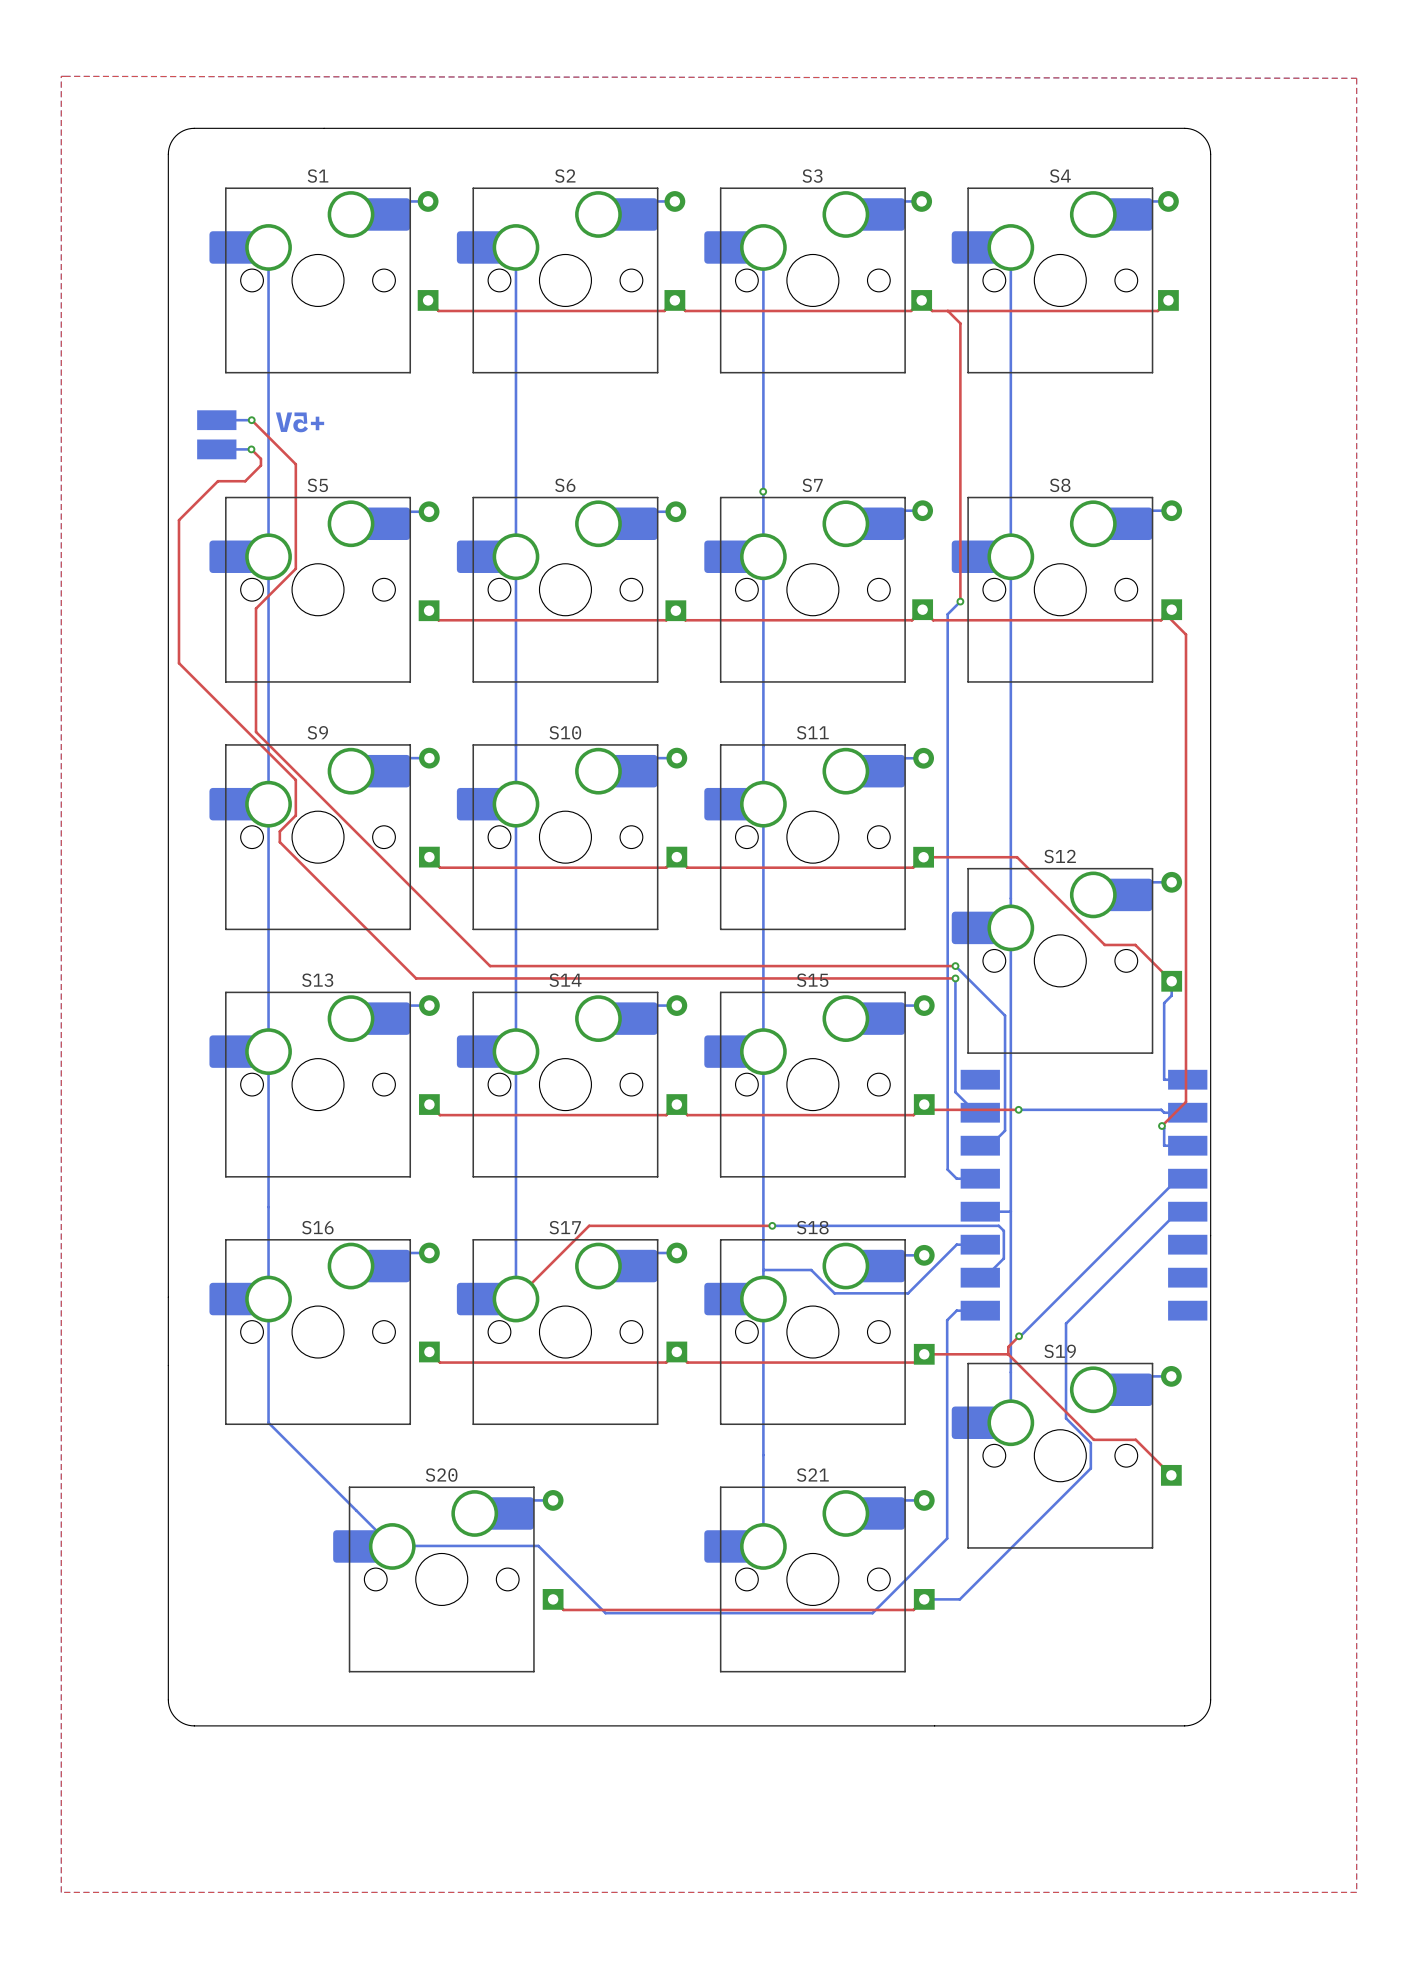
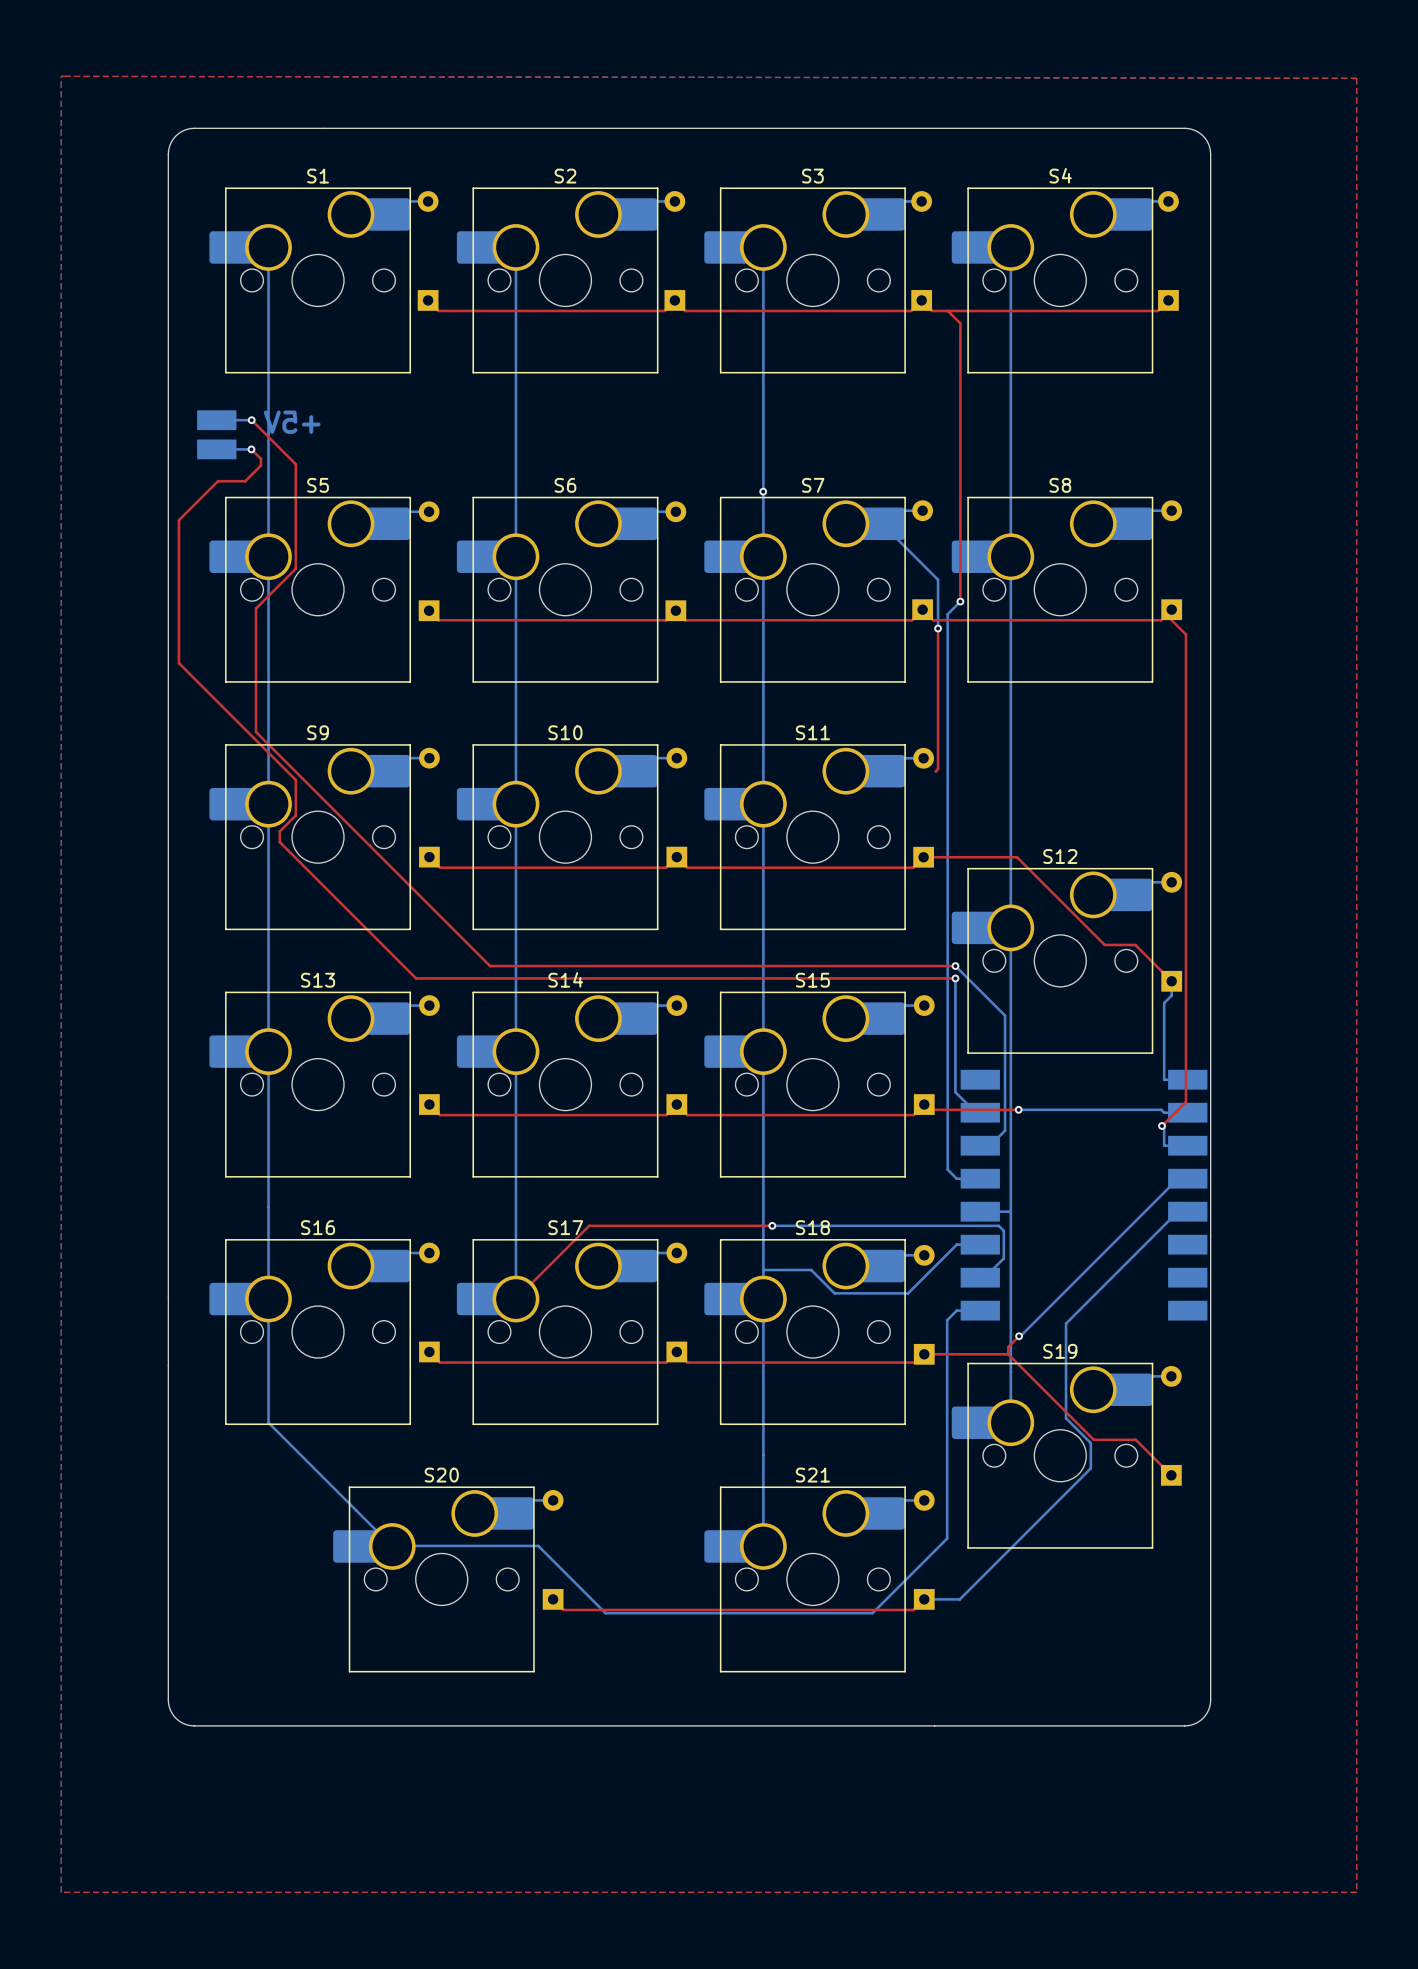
bottom track: none -> (888, 517) (881, 523) (938, 579) (938, 628)
top track: none -> (938, 628) (938, 769) (935, 771)
via: none -> (938, 628)

